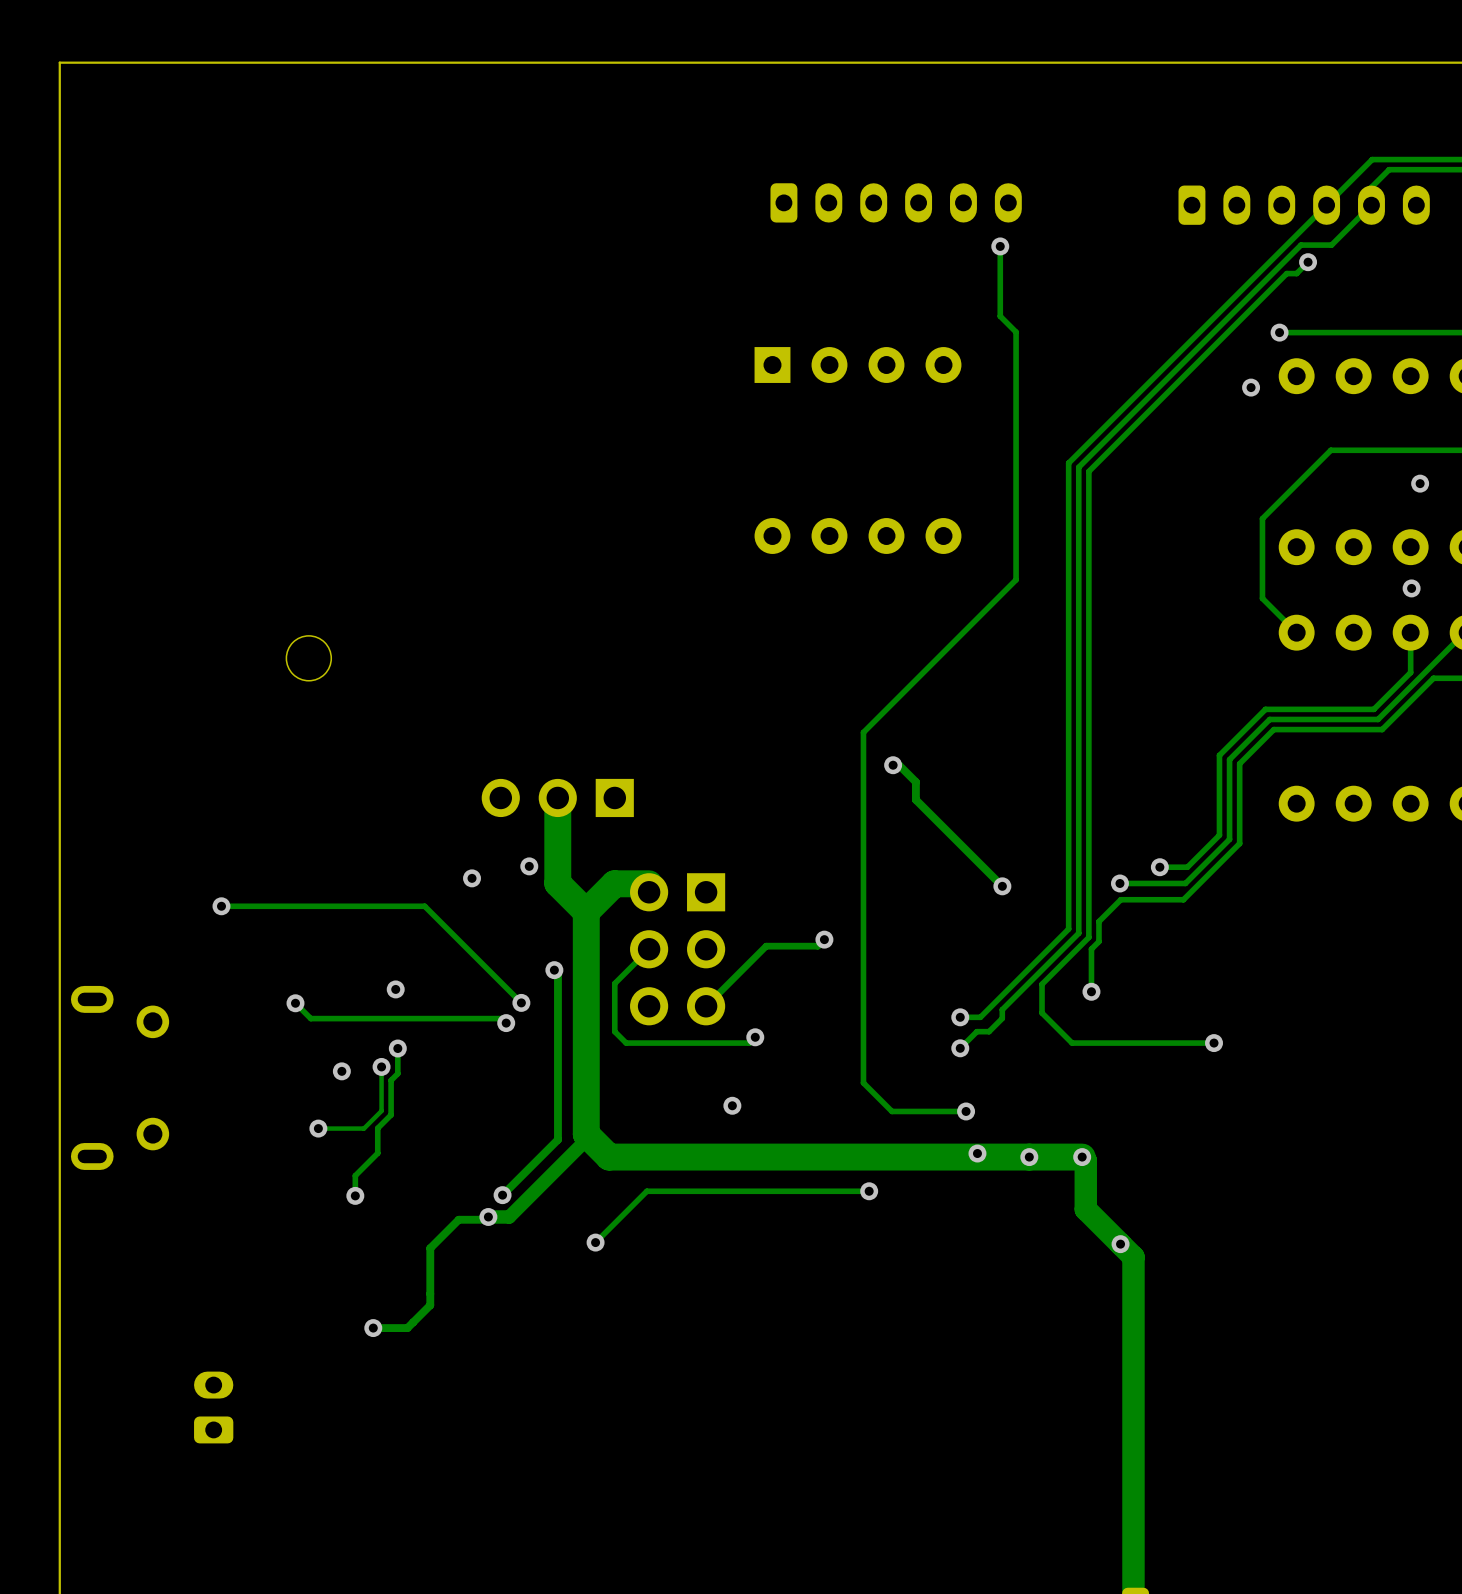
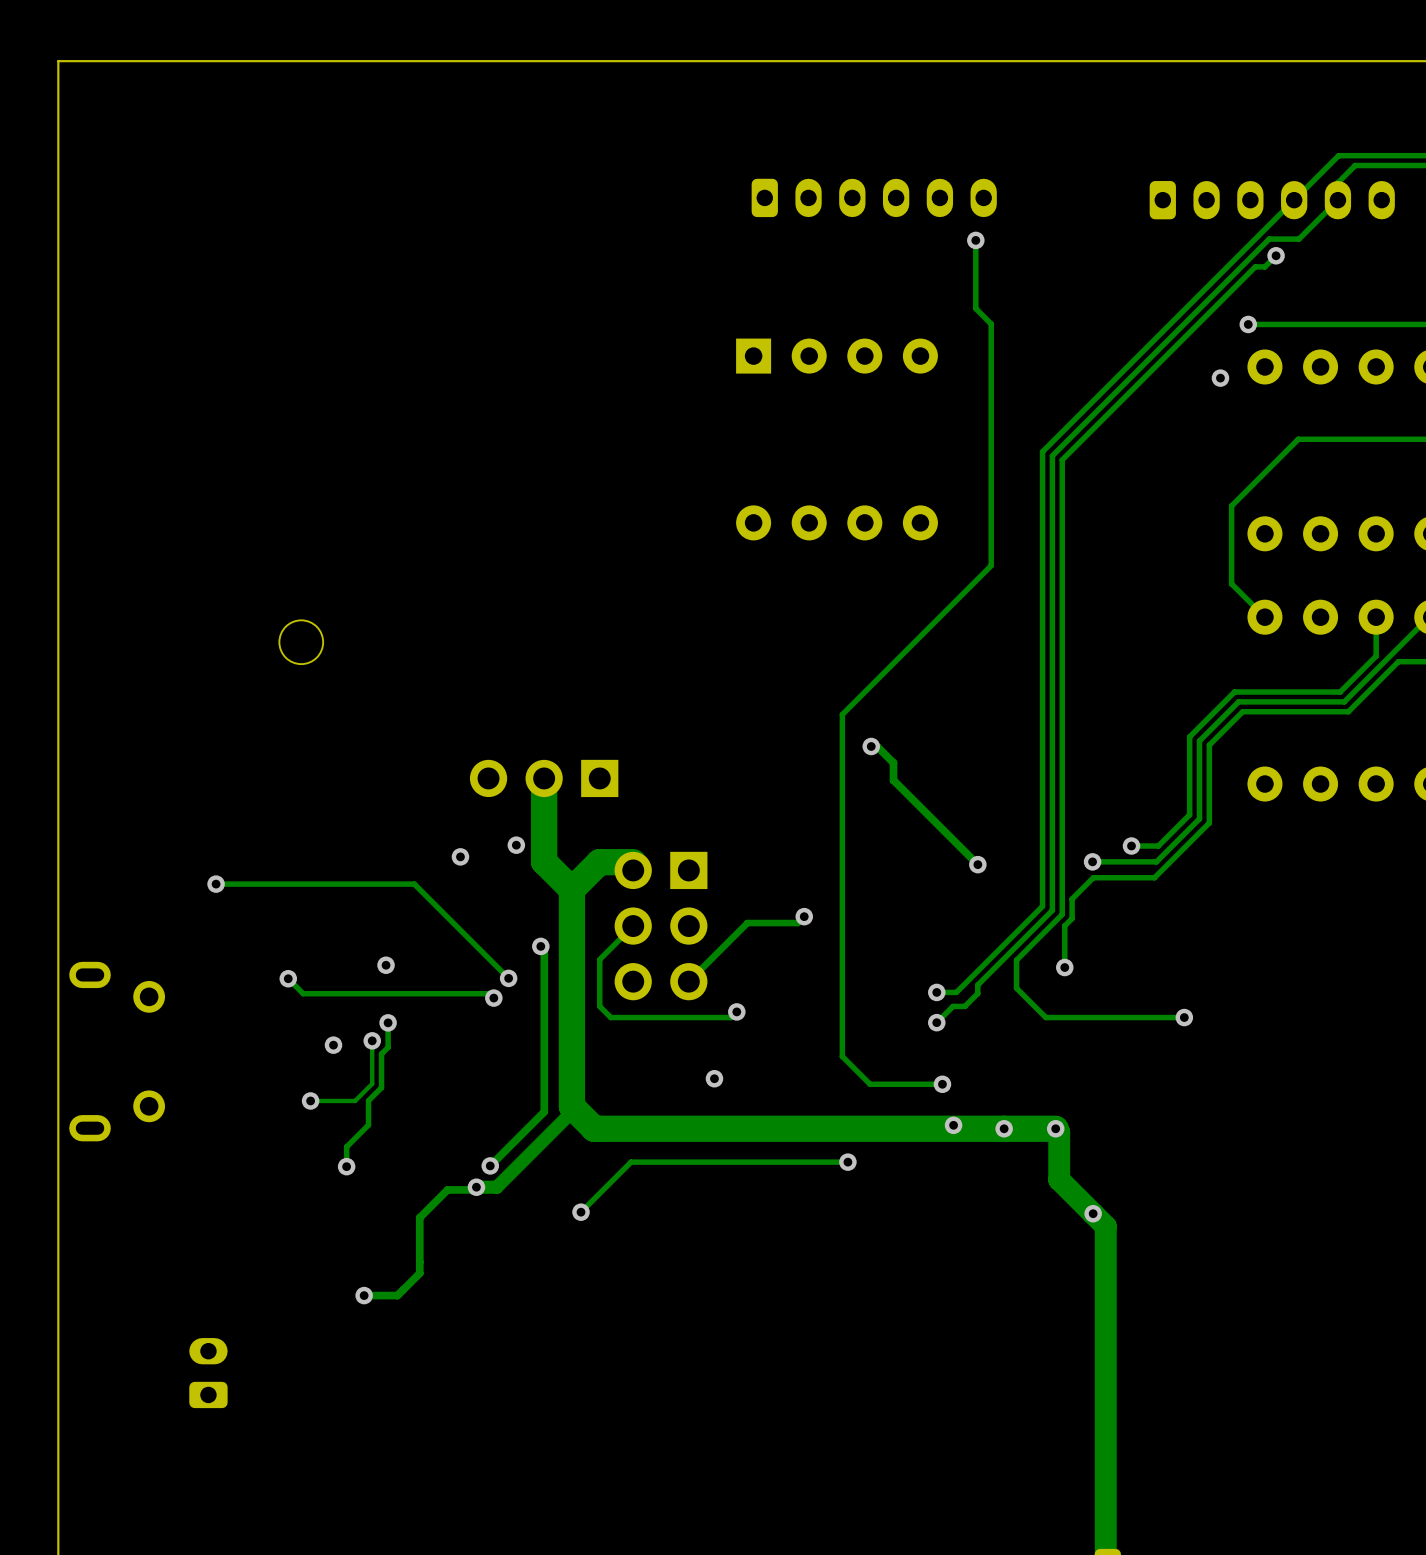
via: (1420, 483) -> none
via: (1411, 588) -> none

